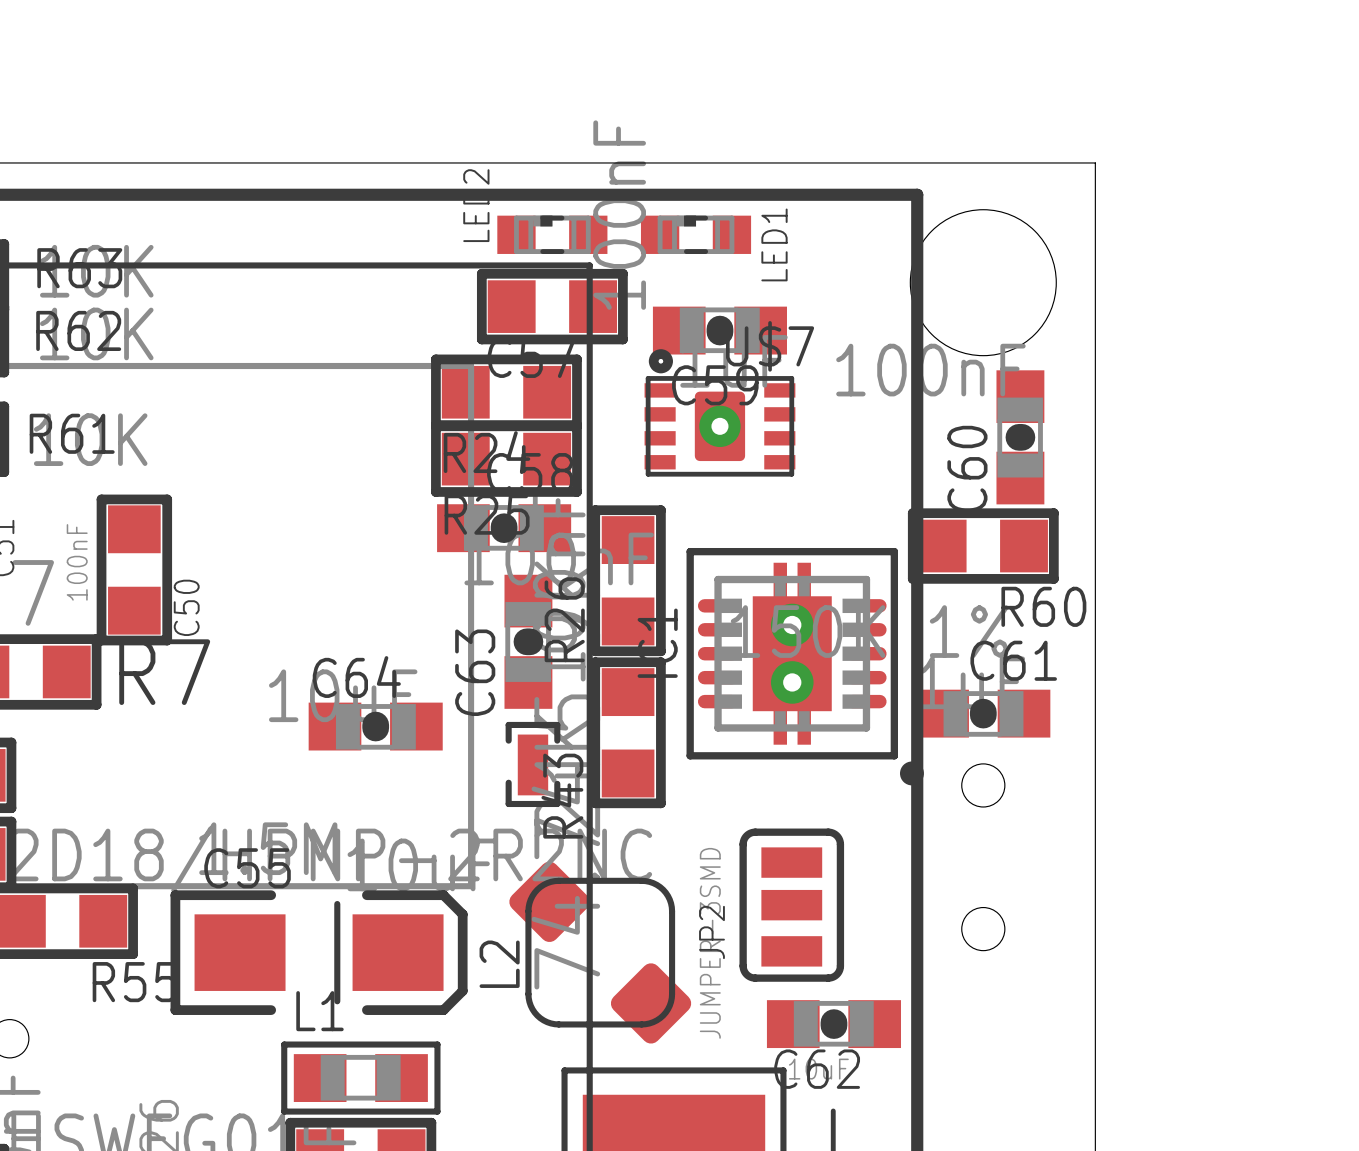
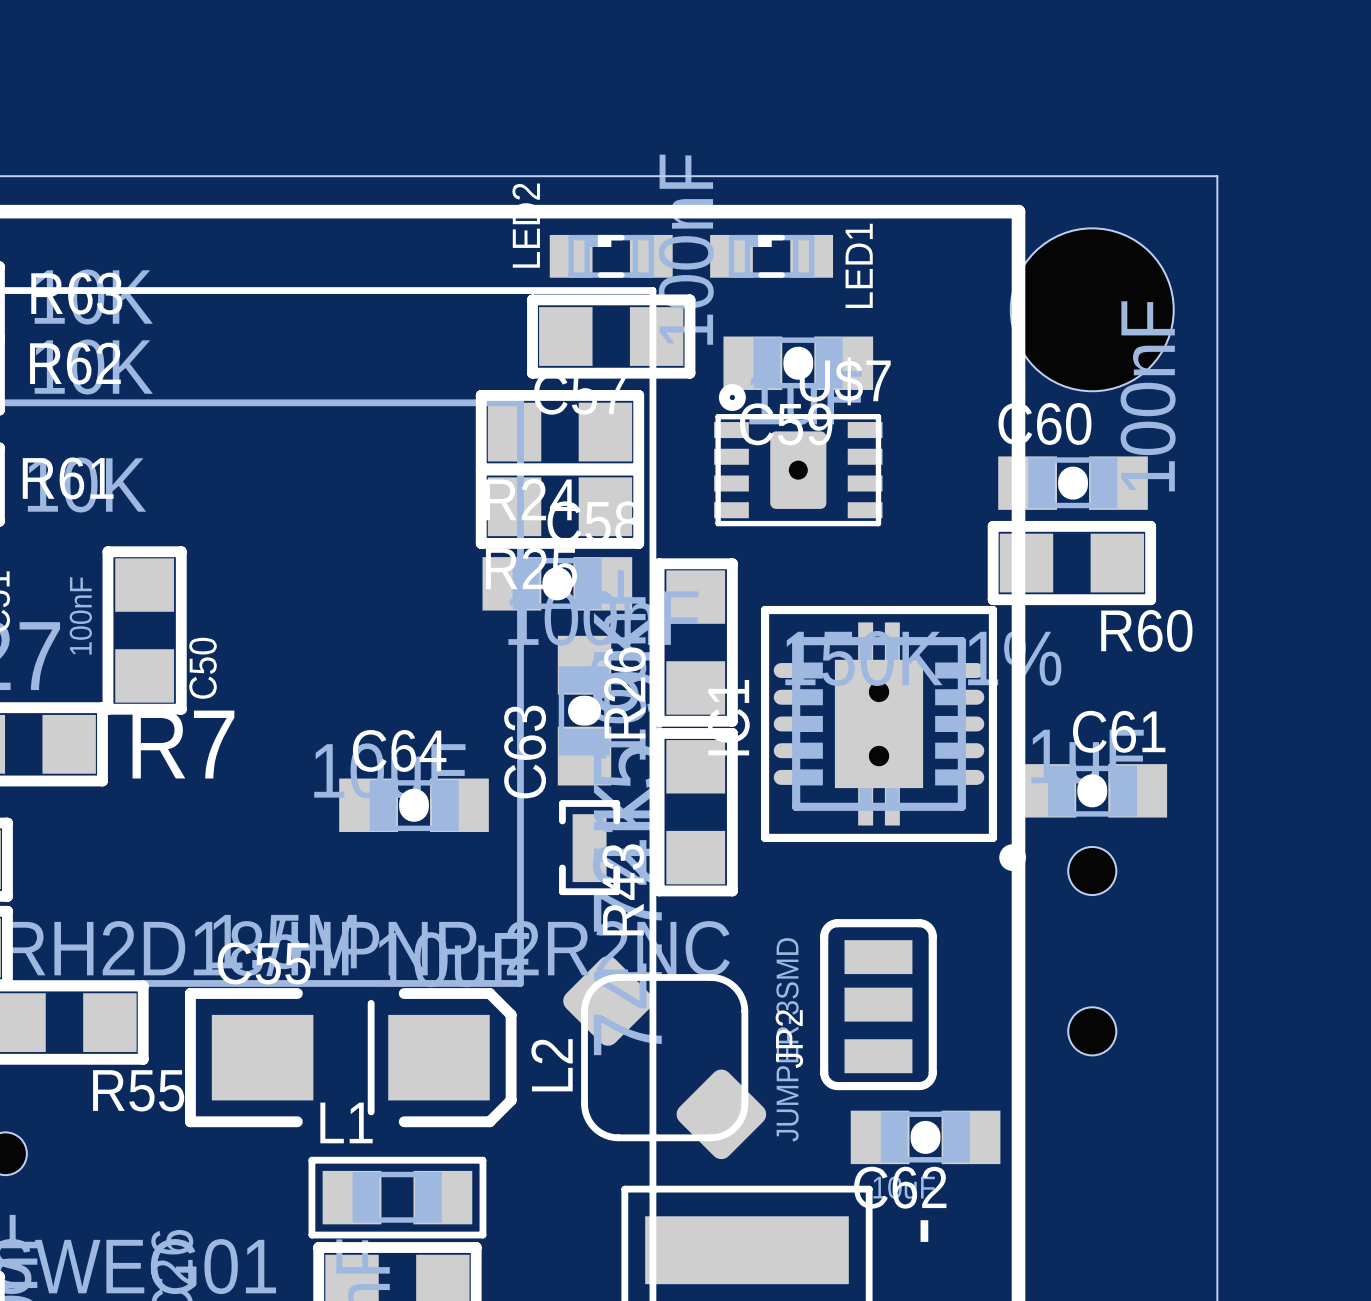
C60 rotation: 0° (1020, 437) -> 90° clockwise (1073, 483)
R60 position: (983, 546) -> (1071, 563)

